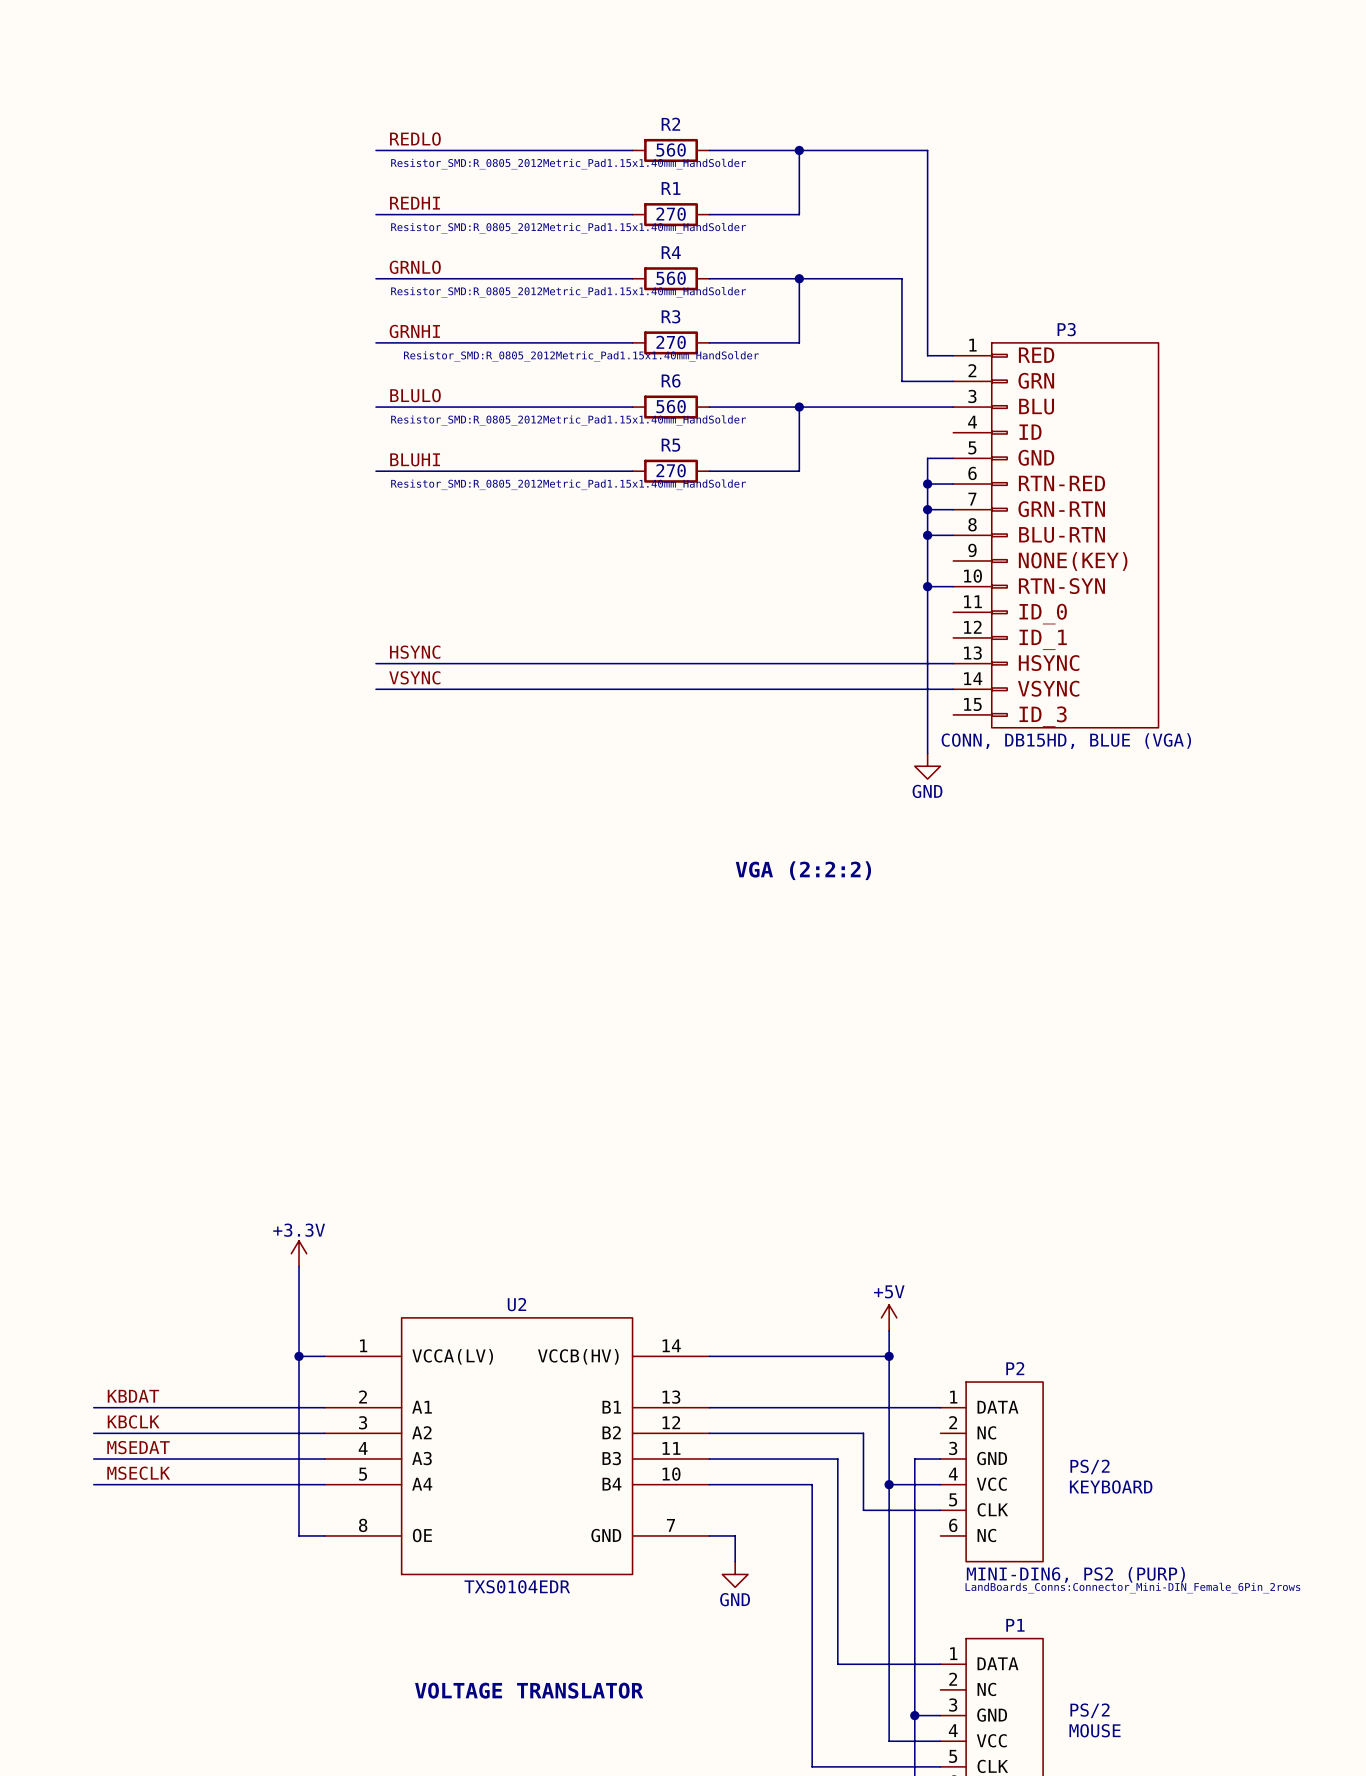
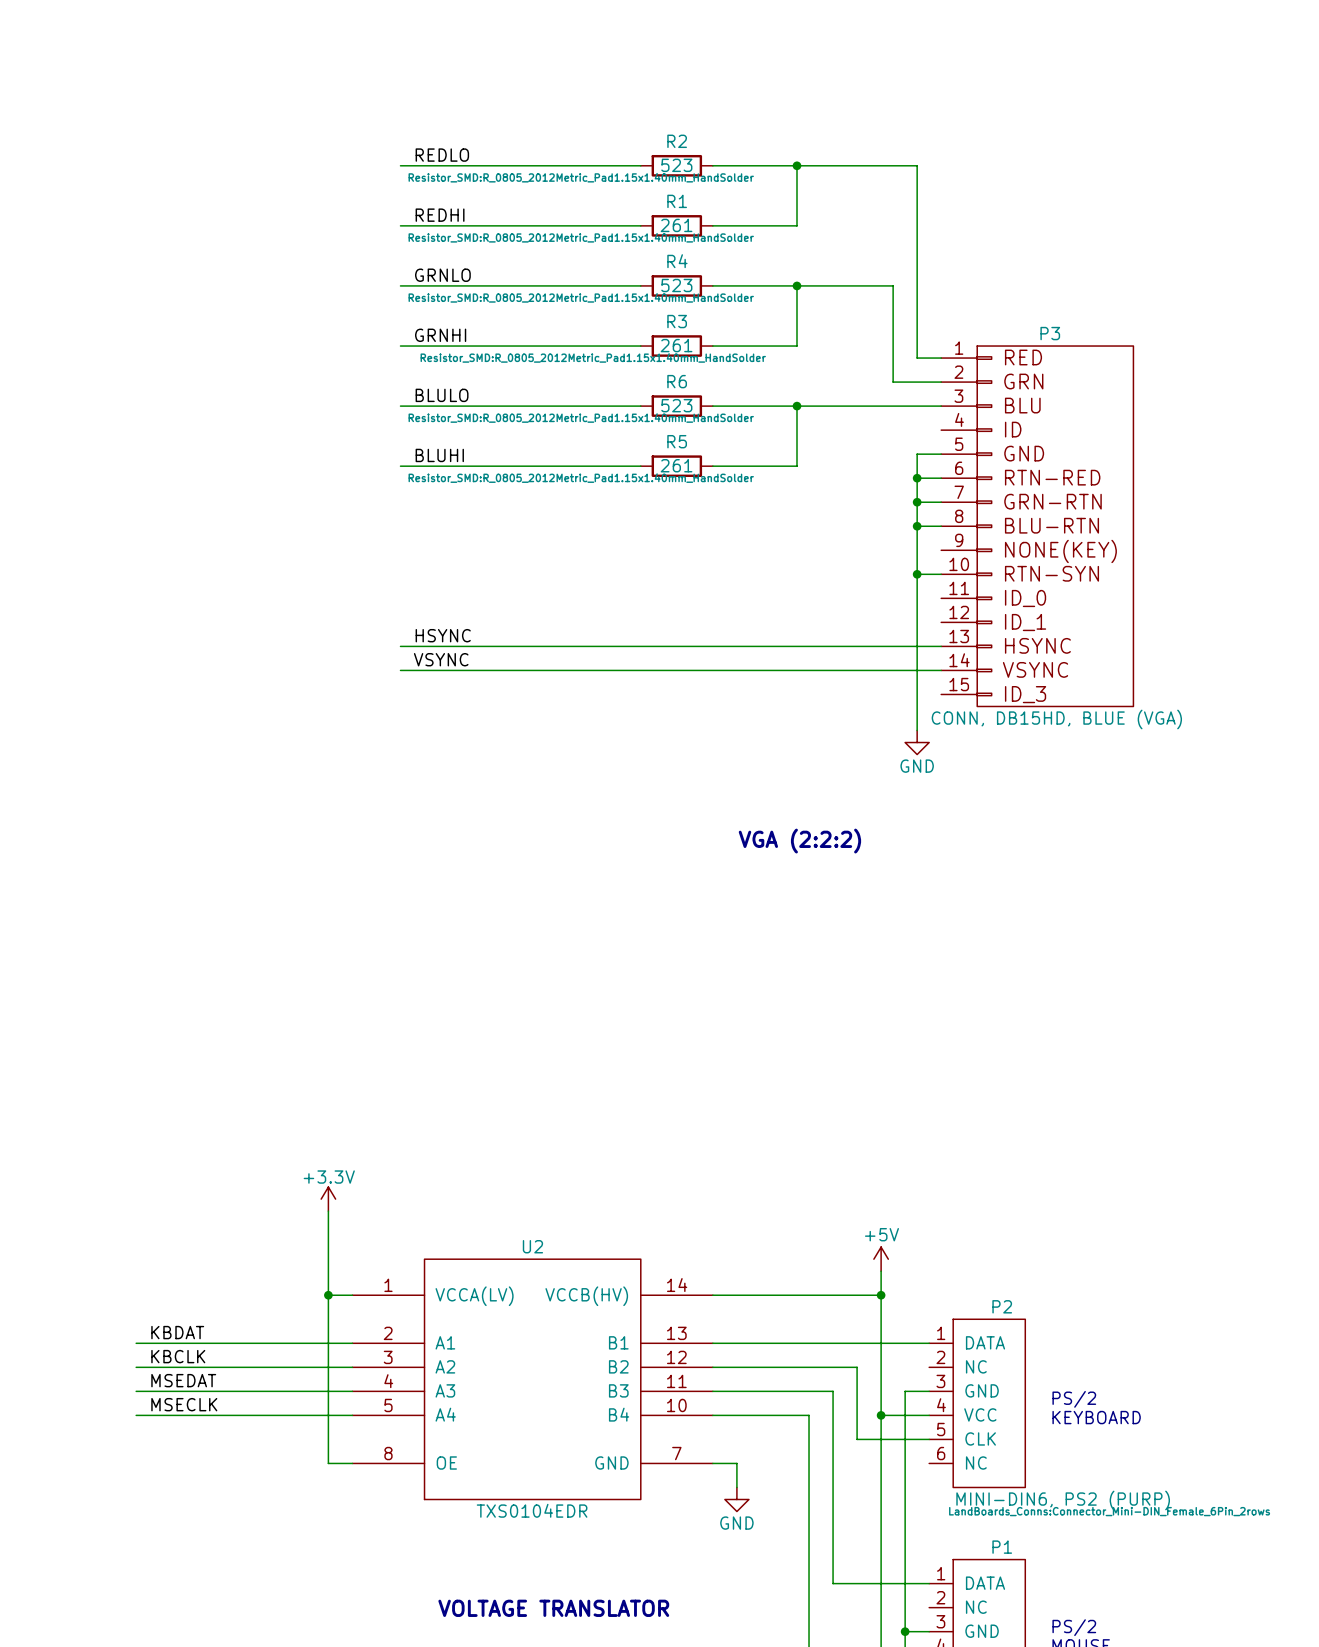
R2 value: 560 (671, 150) -> 523 (676, 165)
R1 value: 270 (671, 214) -> 261 (676, 225)
R4 value: 560 (671, 278) -> 523 (676, 285)
R3 value: 270 (671, 342) -> 261 (676, 345)
R6 value: 560 (671, 406) -> 523 (676, 405)
R5 value: 270 (671, 470) -> 261 (676, 465)

